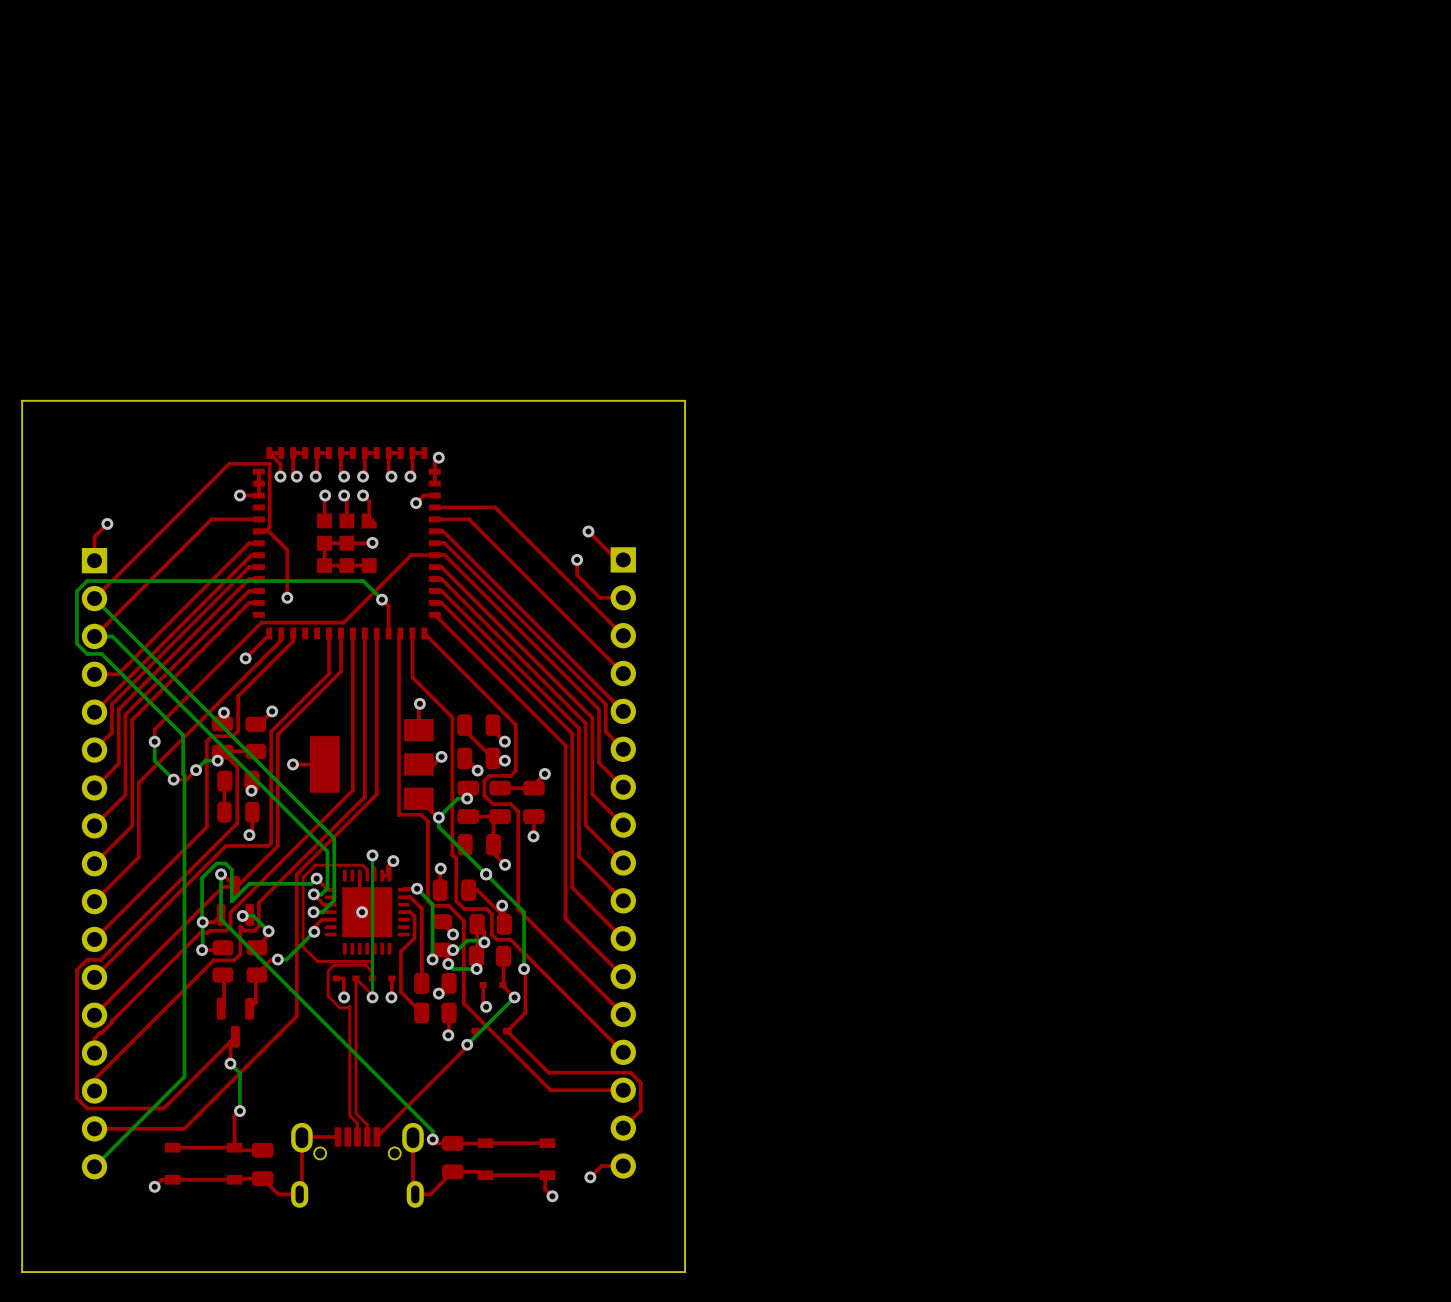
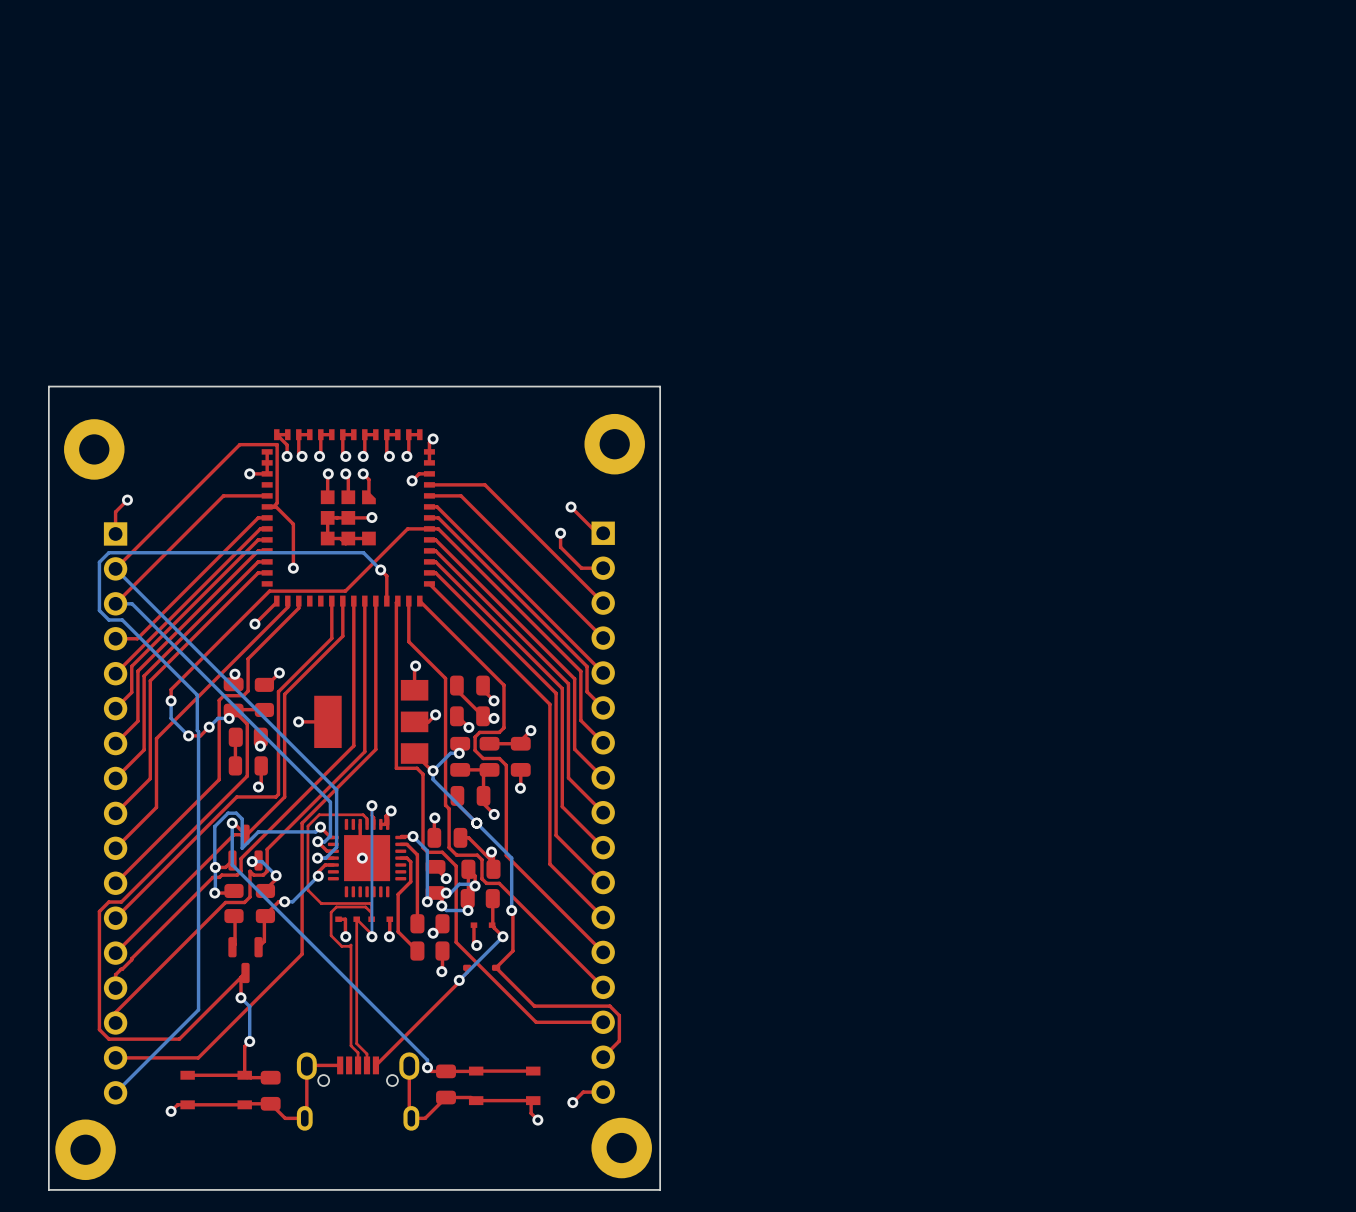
part: none -> (614, 444)
part: none -> (94, 449)
part: none -> (621, 1148)
part: none -> (85, 1149)

